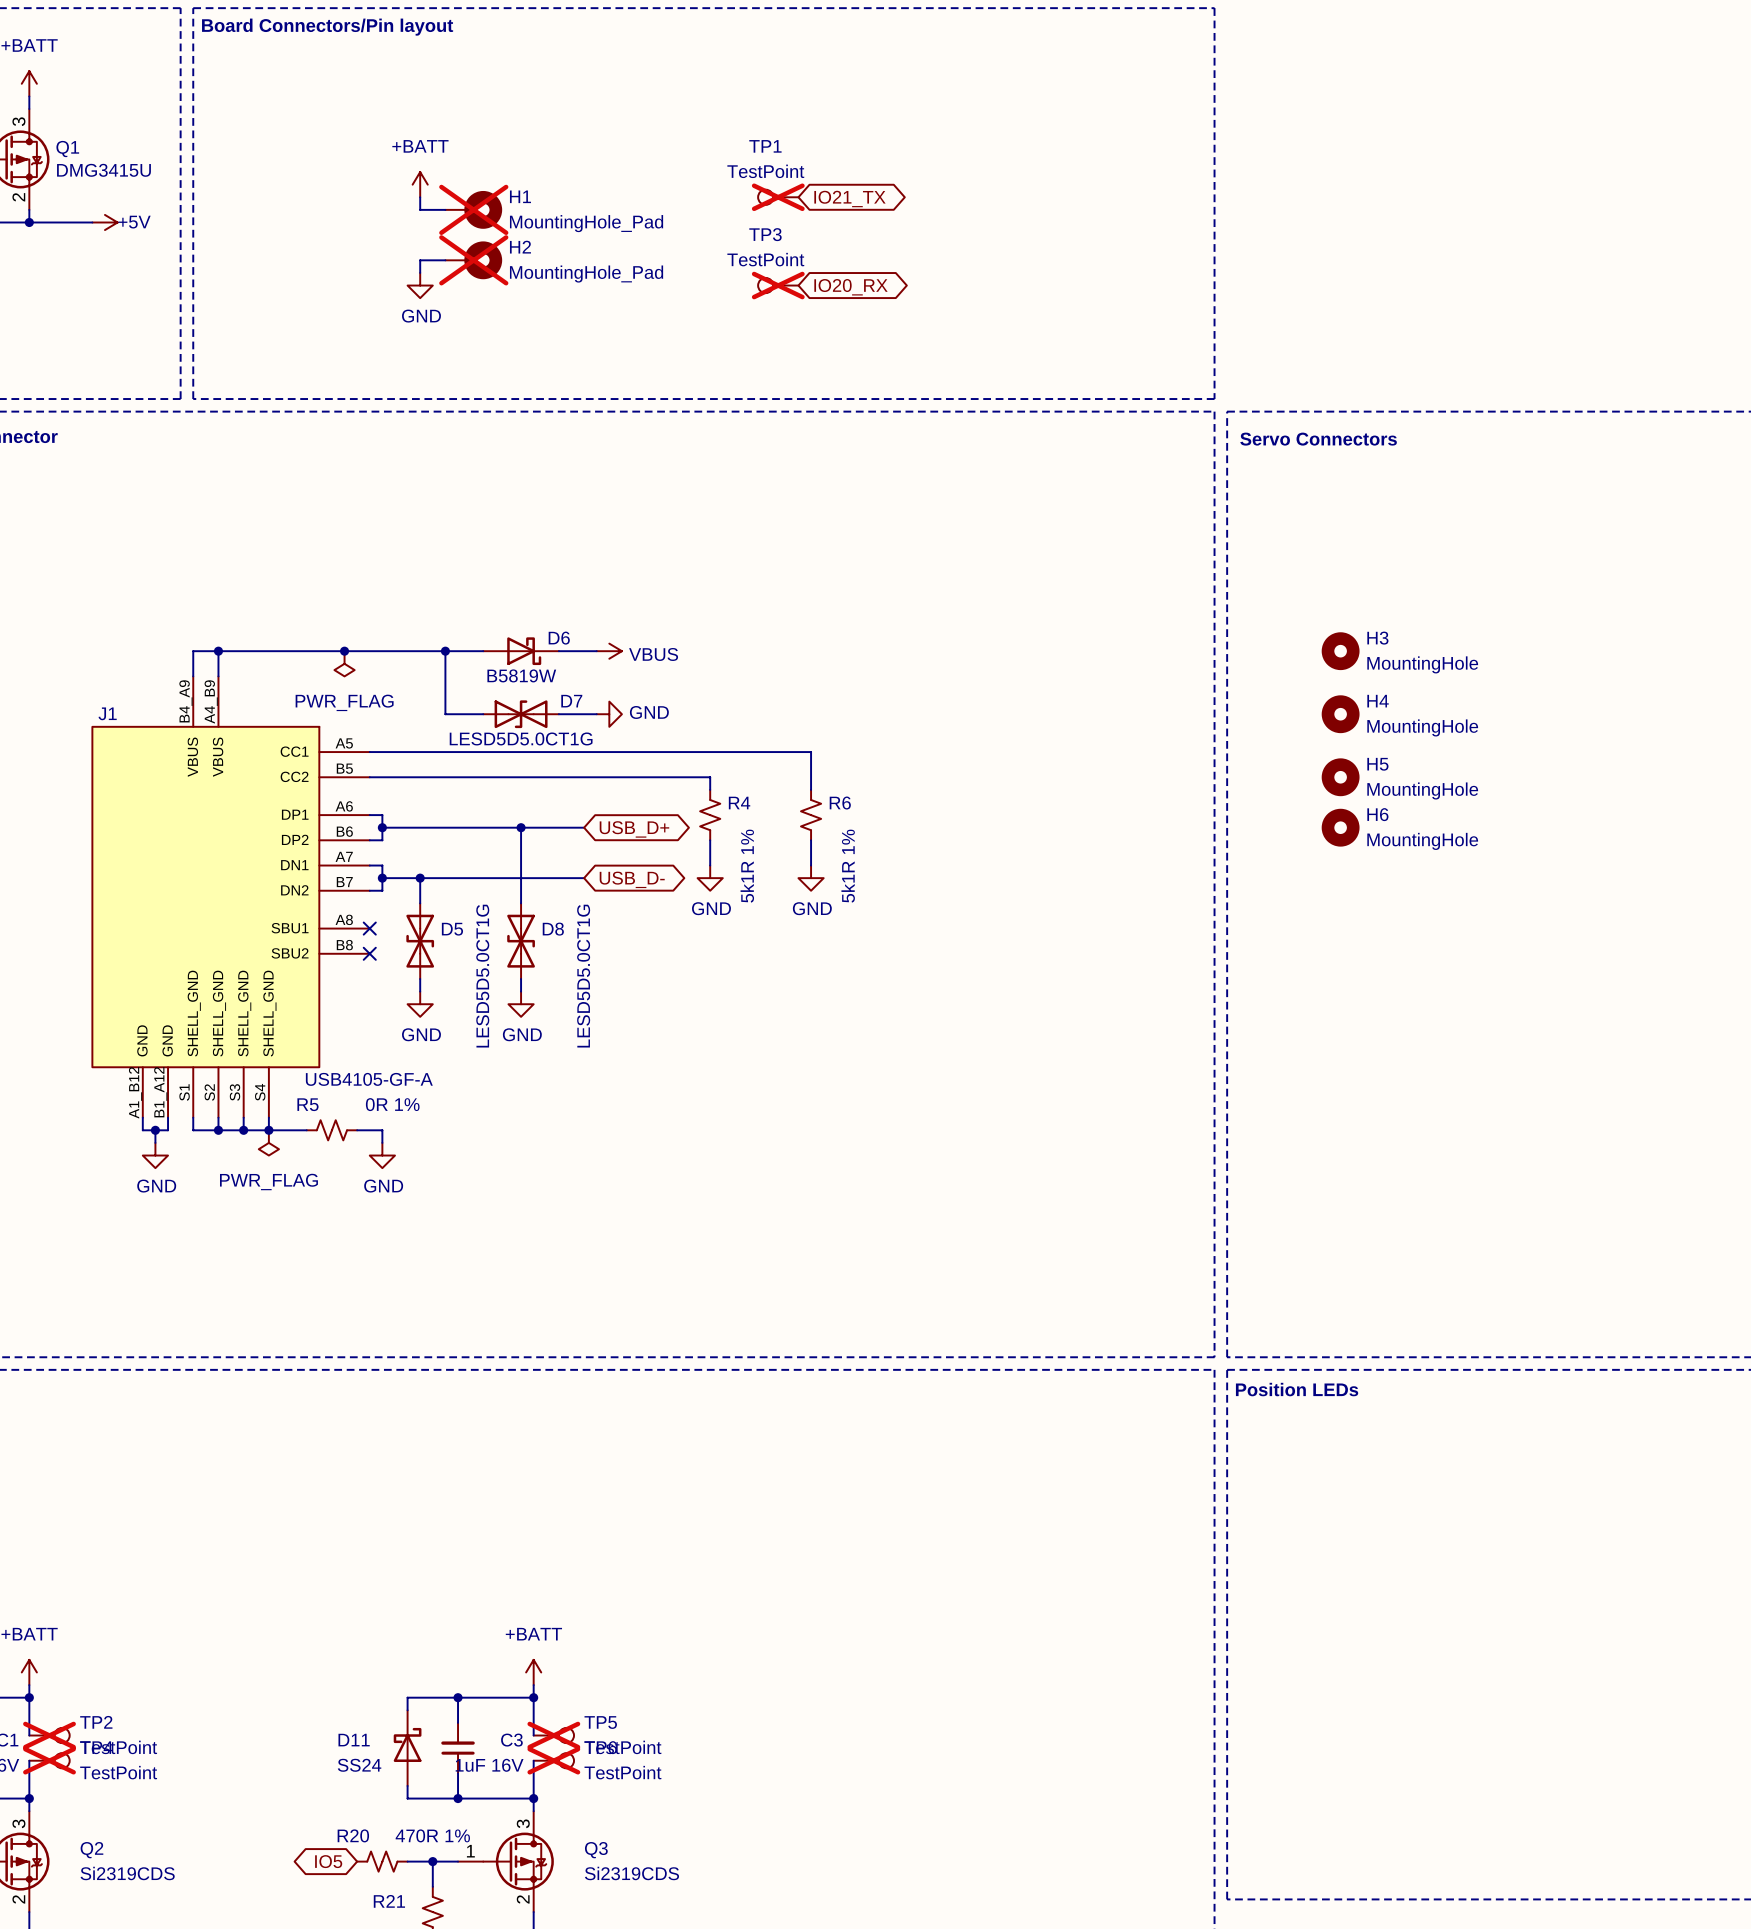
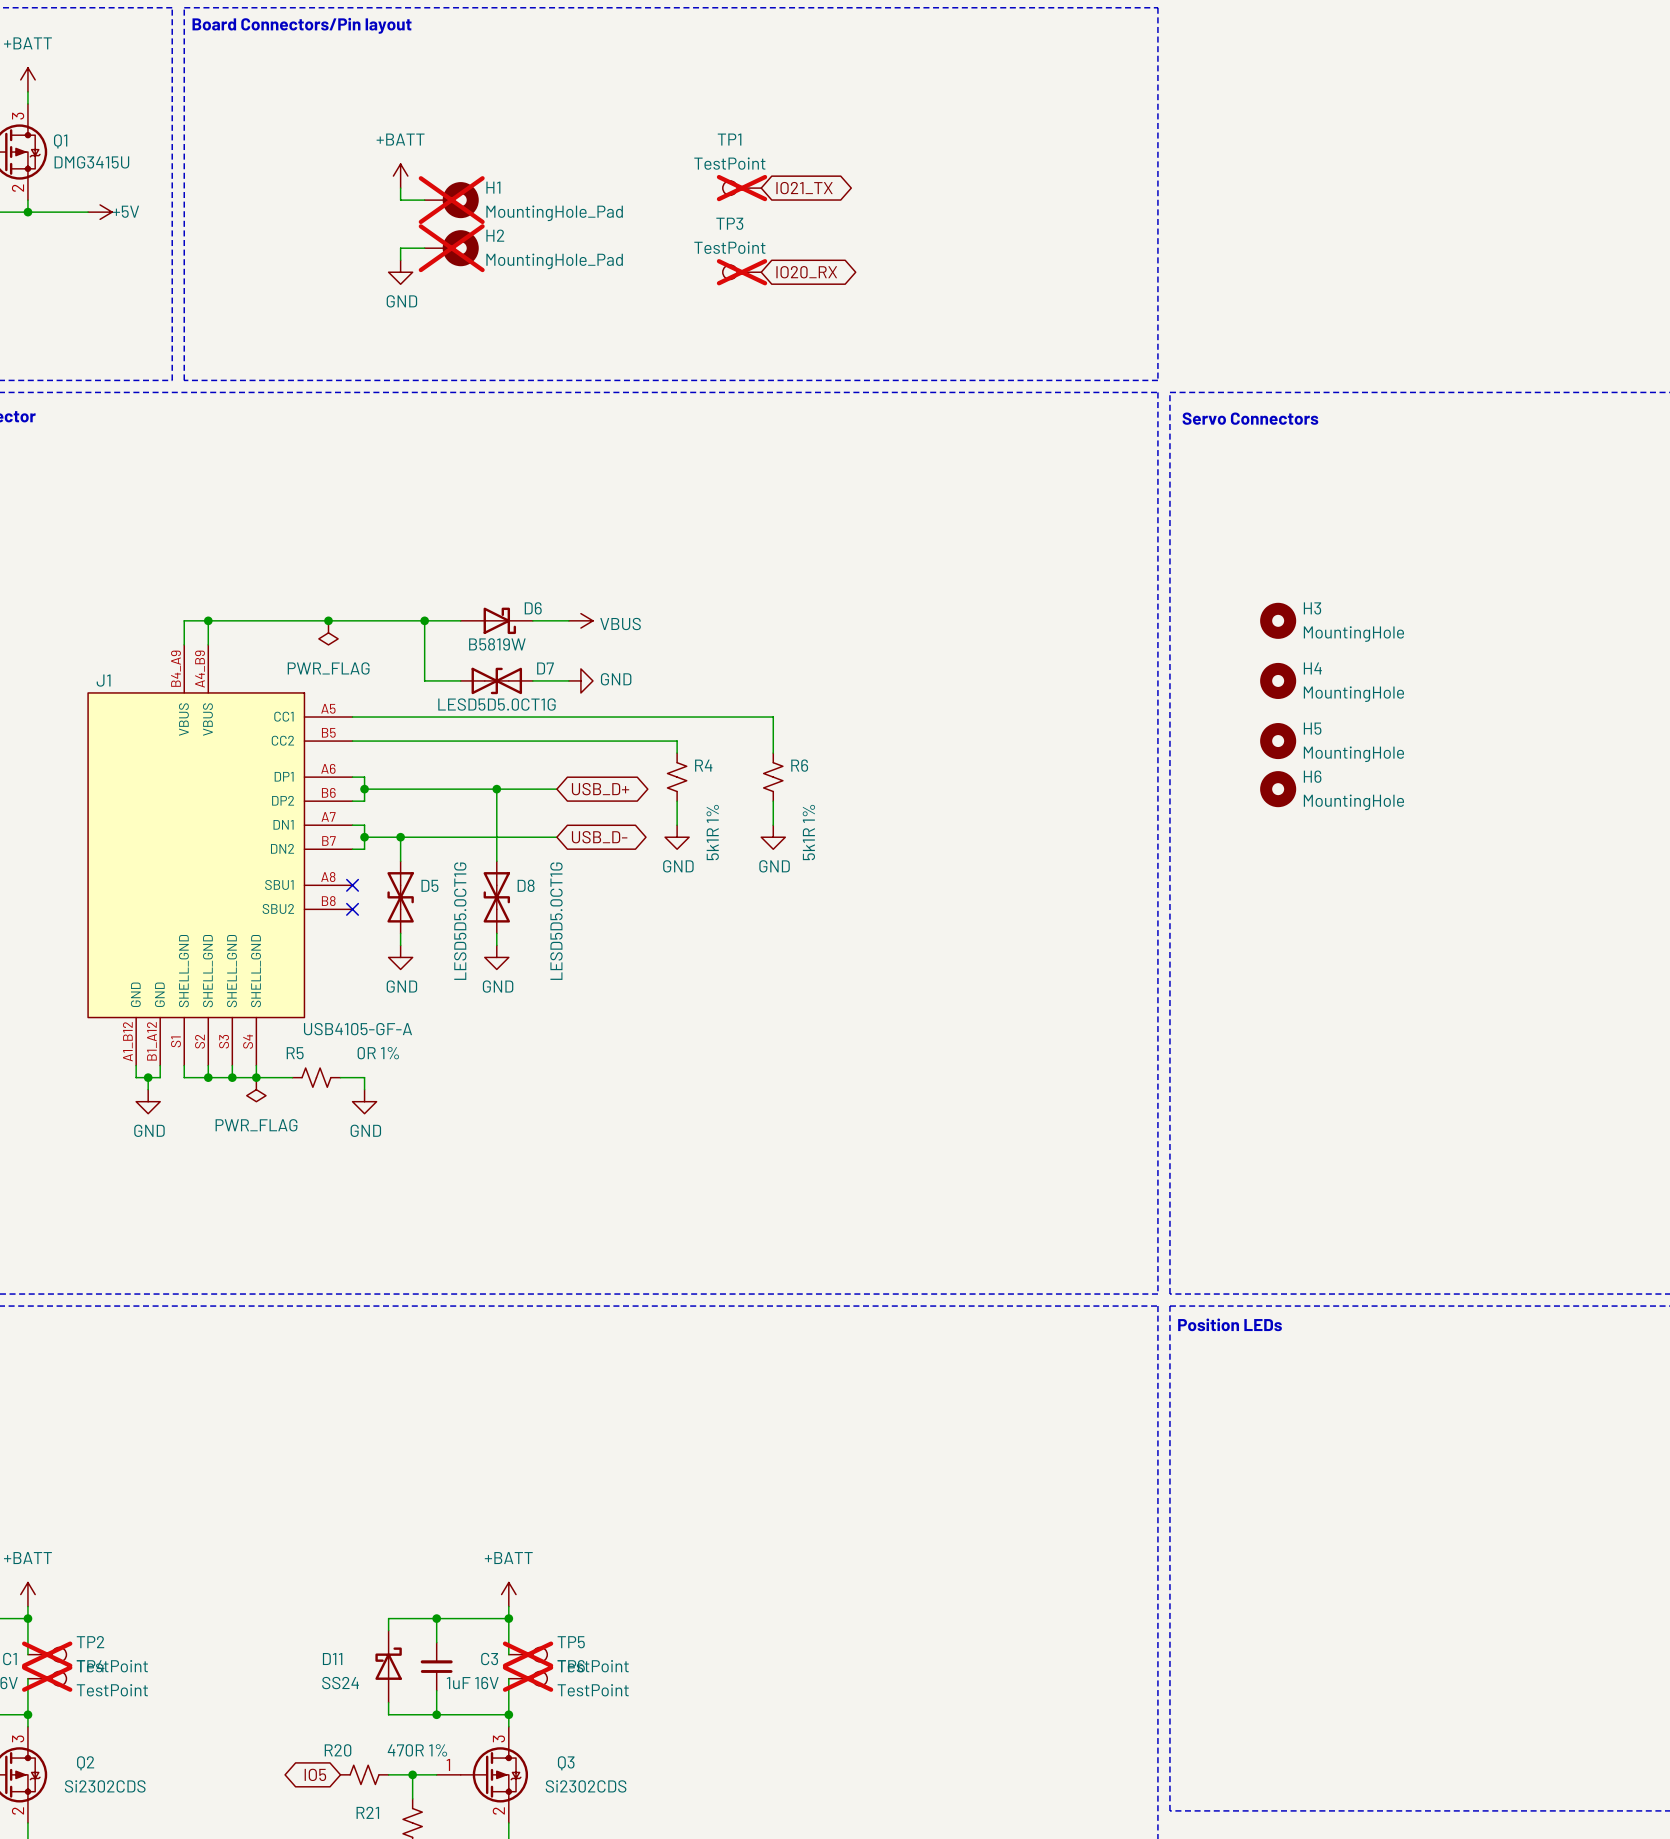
Q2 value: Si2319CDS (127, 1873) -> Si2302CDS (105, 1786)
Q3 value: Si2319CDS (631, 1873) -> Si2302CDS (586, 1786)

